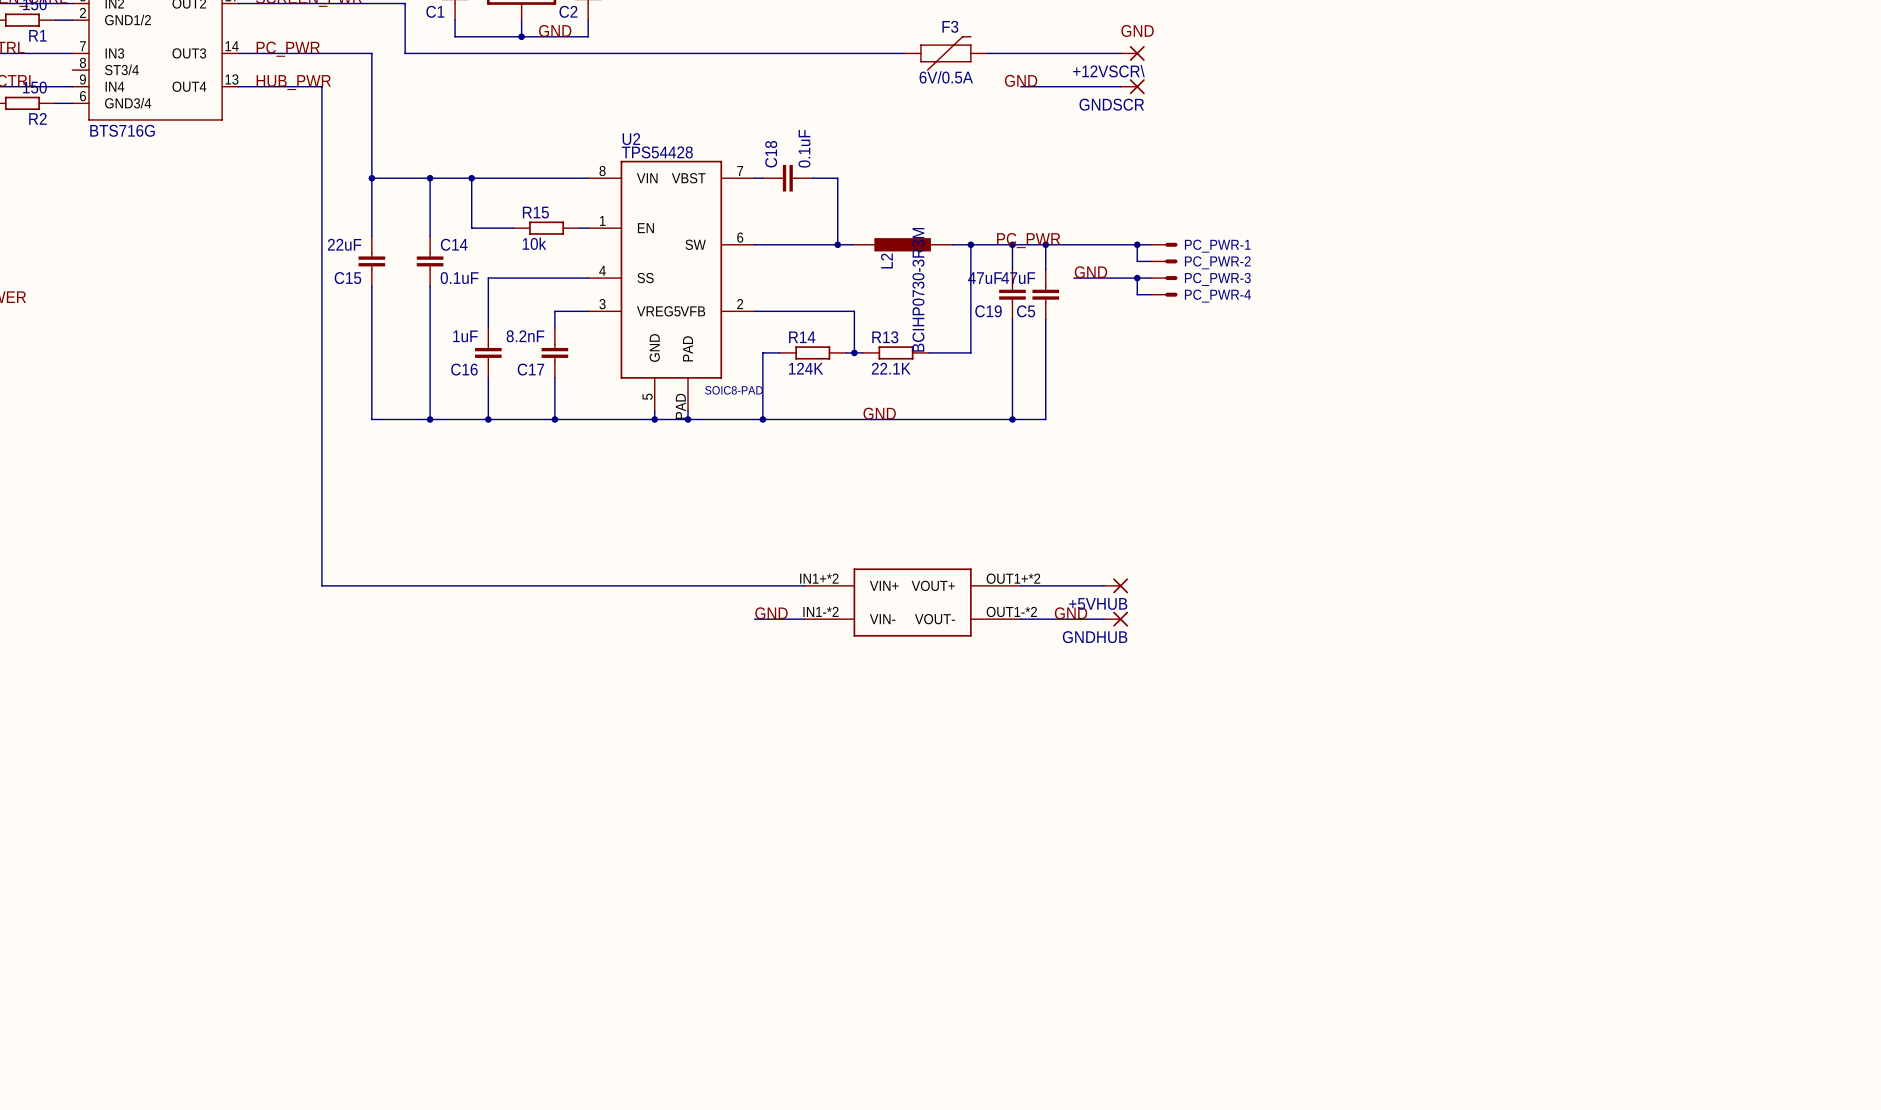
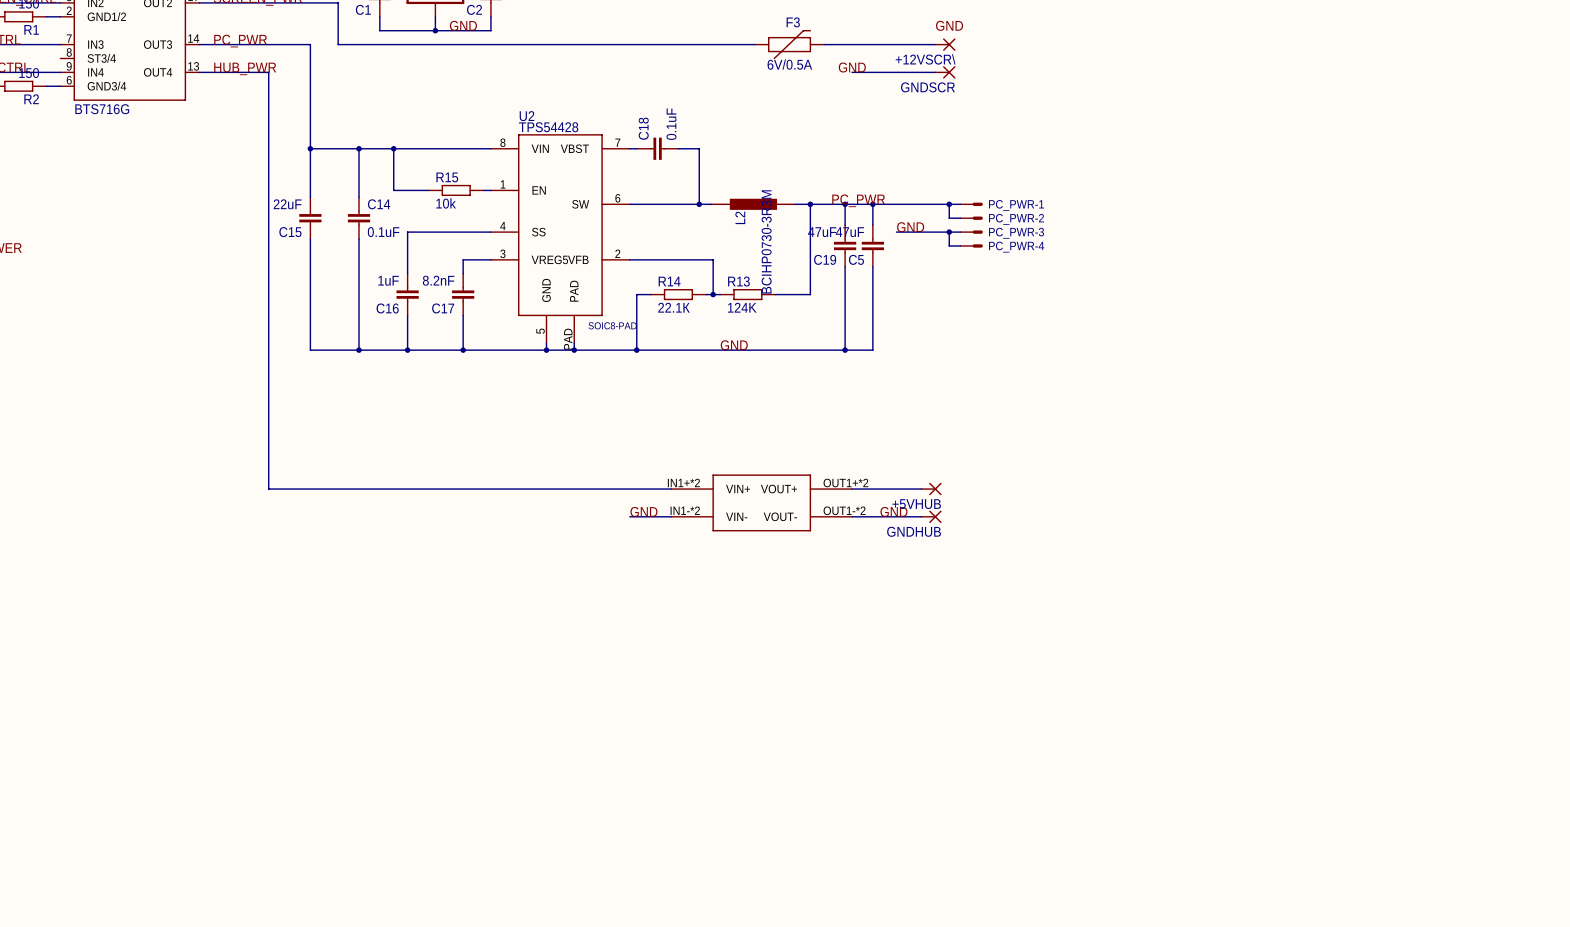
R14 value: 124K (806, 368) -> 22.1К (673, 307)
R13 value: 22.1K (891, 368) -> 124K (742, 307)

